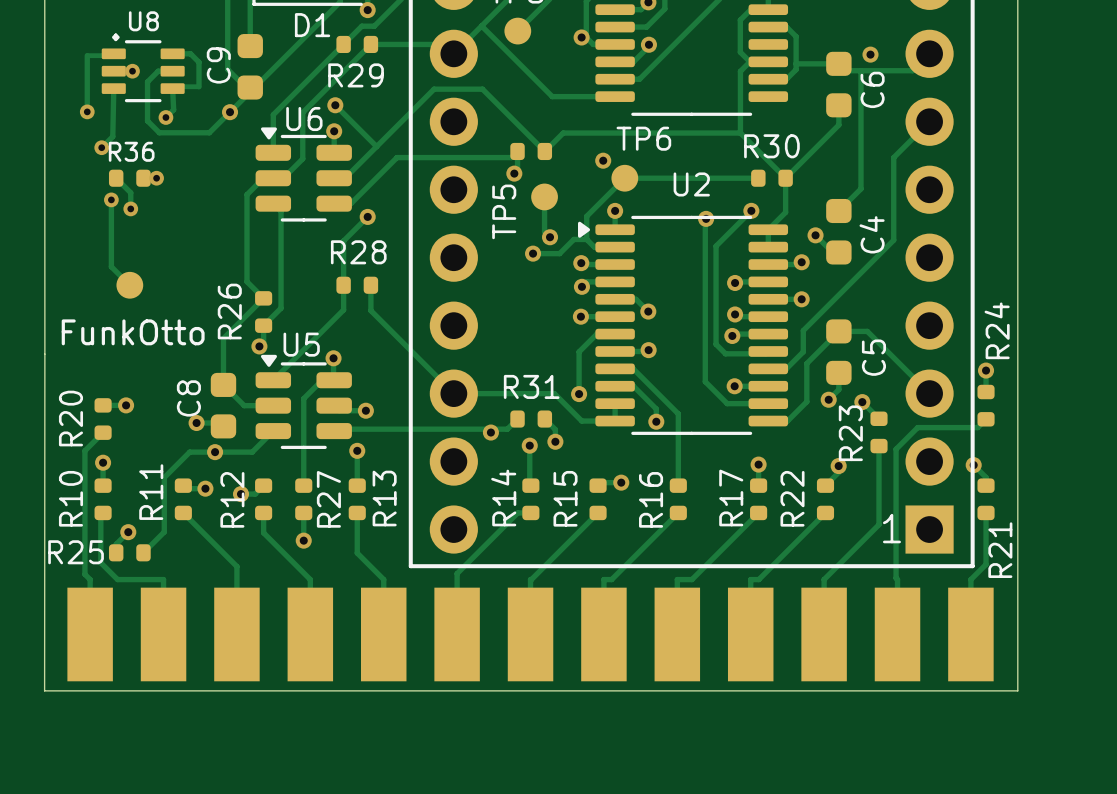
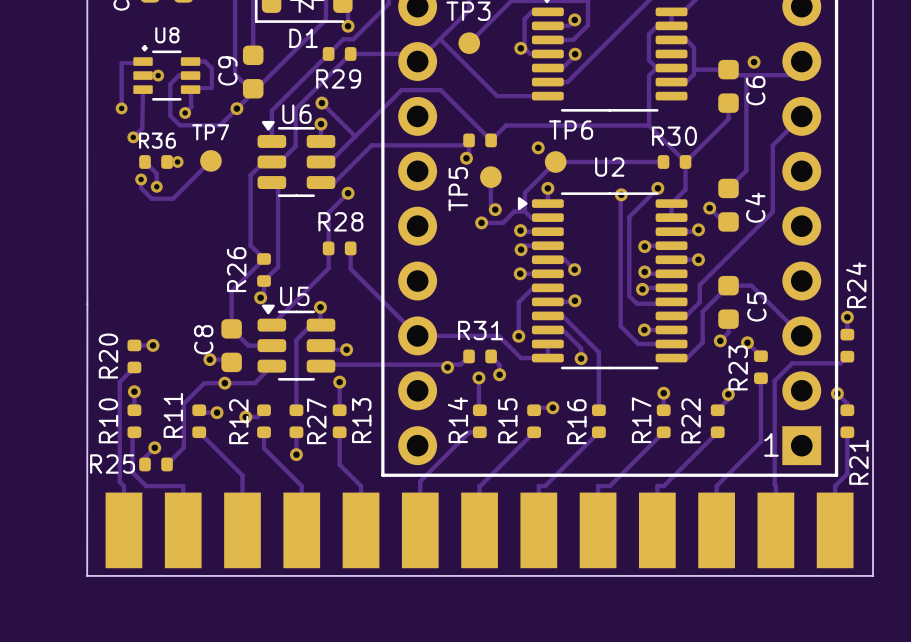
TP7: none -> (210, 160)
track: (111, 210) (111, 266) (129, 285) -> (141, 188) (151, 198) (173, 198) (210, 160)
part: (129, 285) -> none
text: FunkOtto (133, 332) -> none

